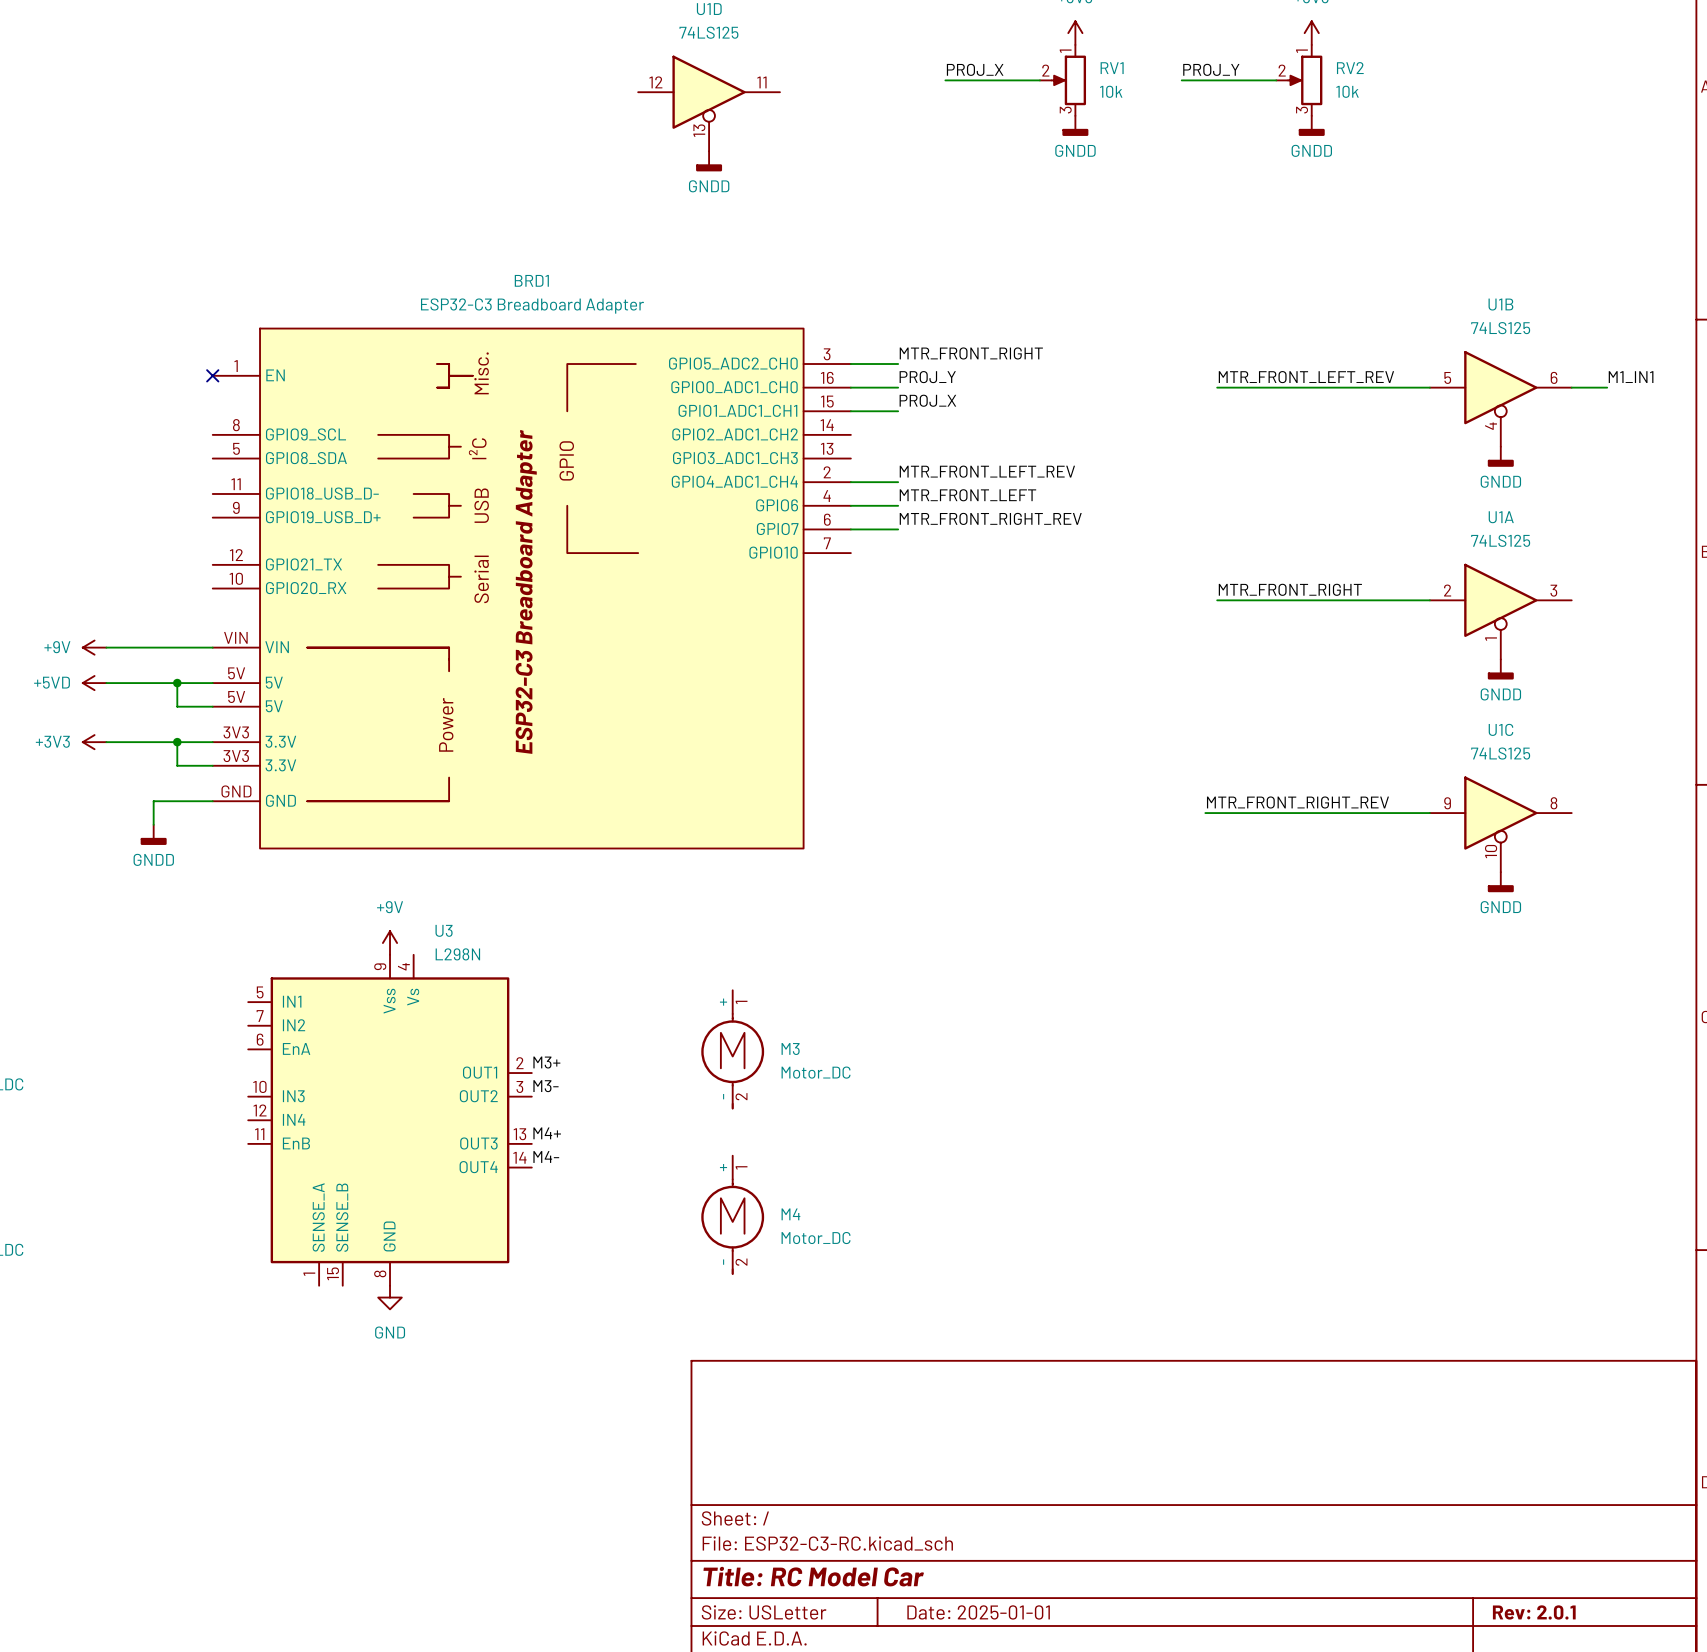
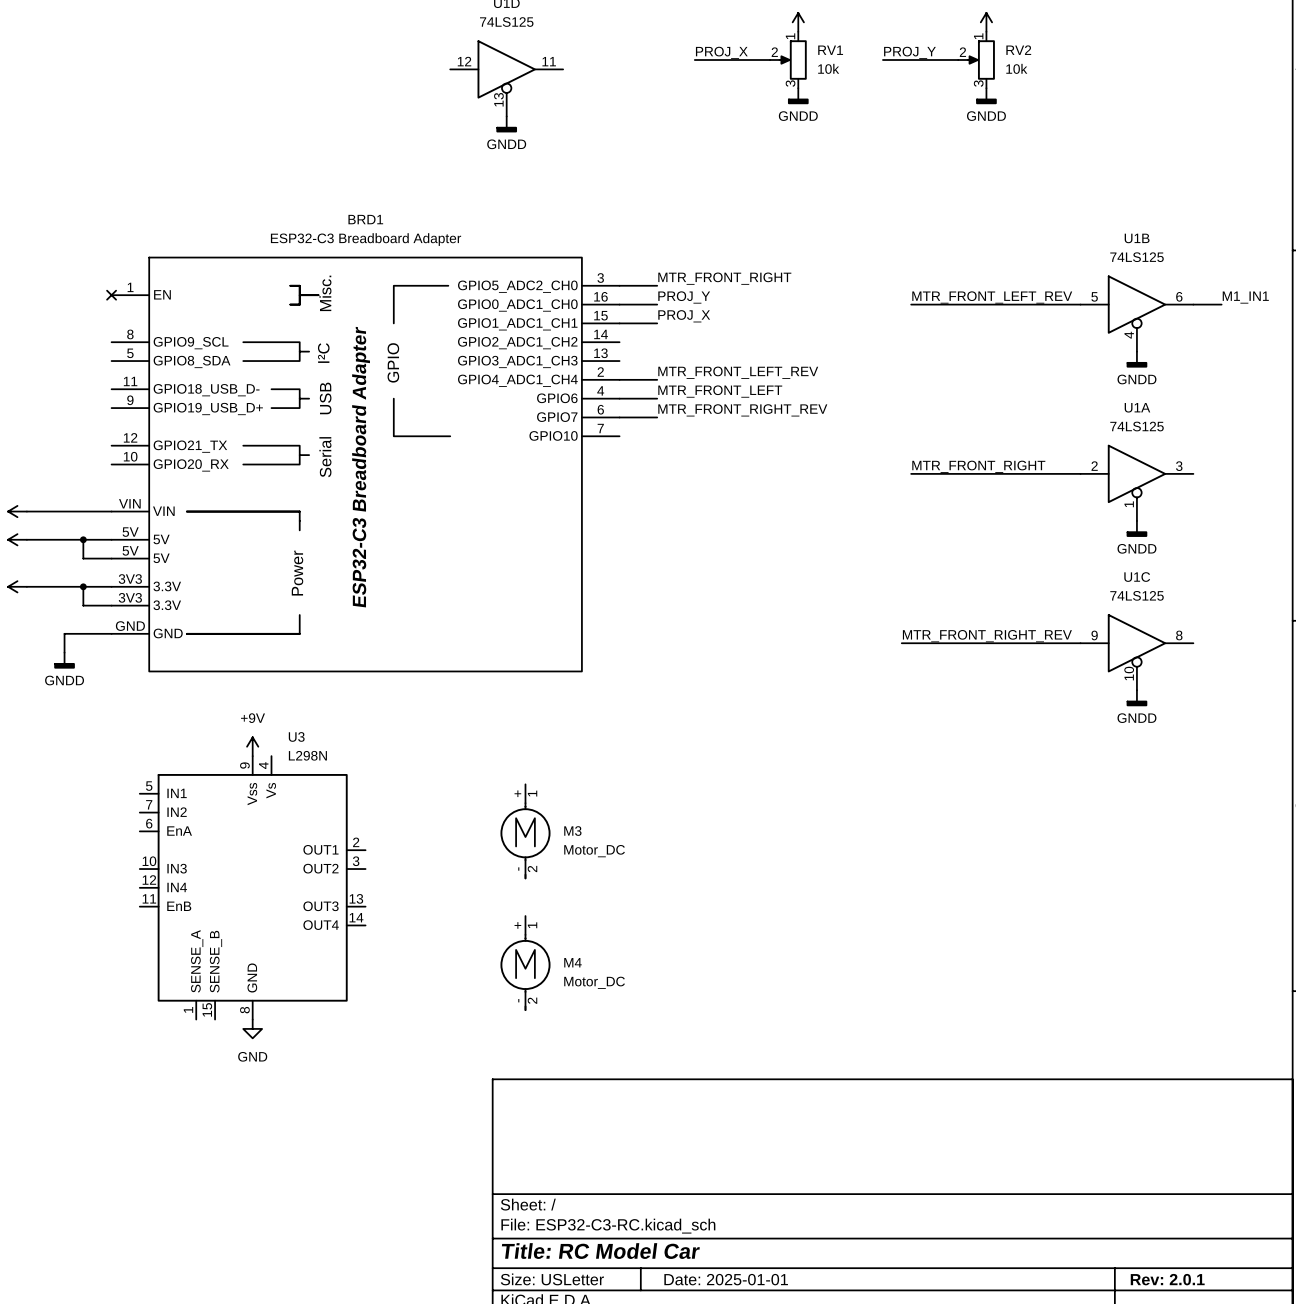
label: M3+ (546, 1062) -> none
label: M3- (545, 1086) -> none
label: M4+ (547, 1133) -> none
label: M4- (546, 1157) -> none

